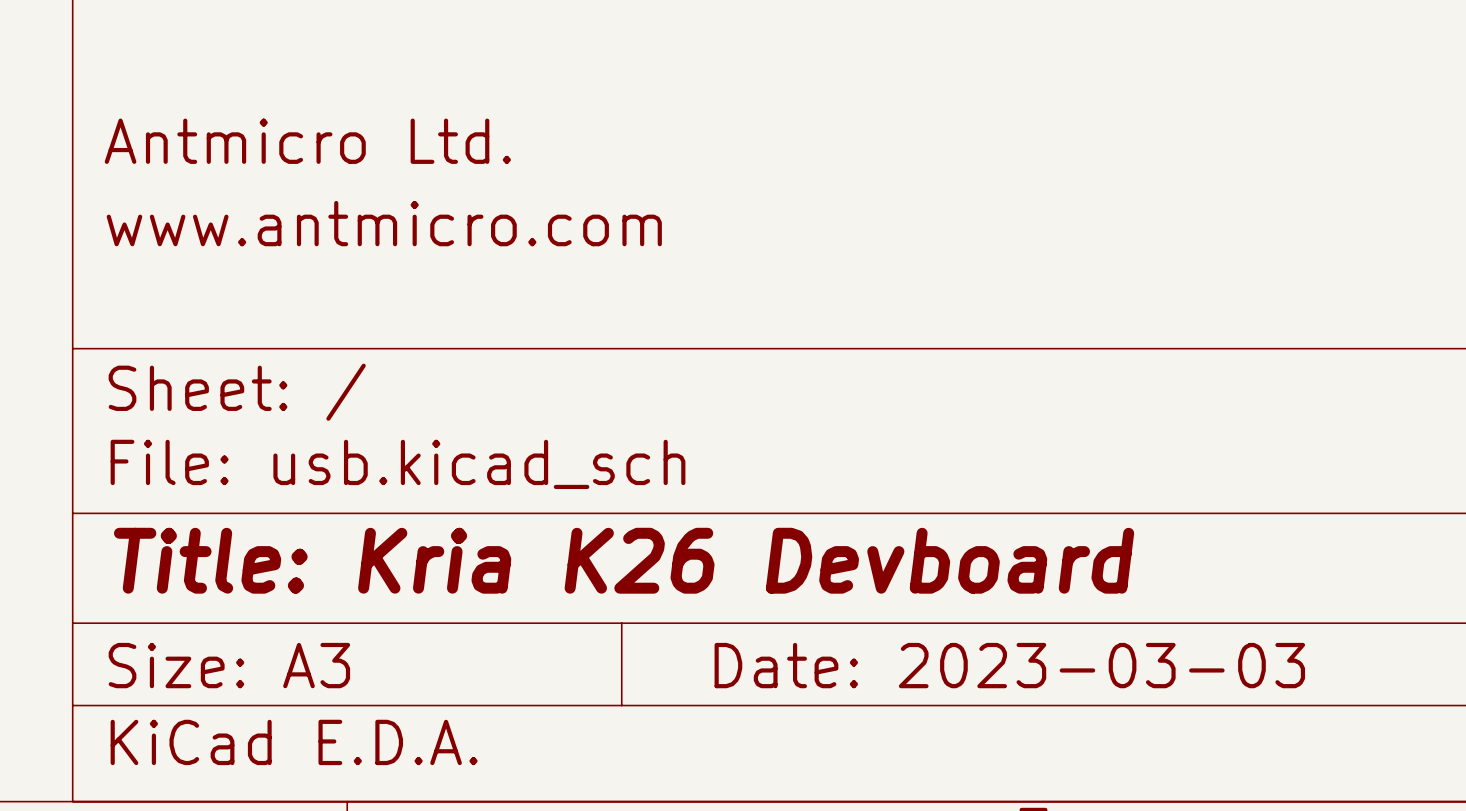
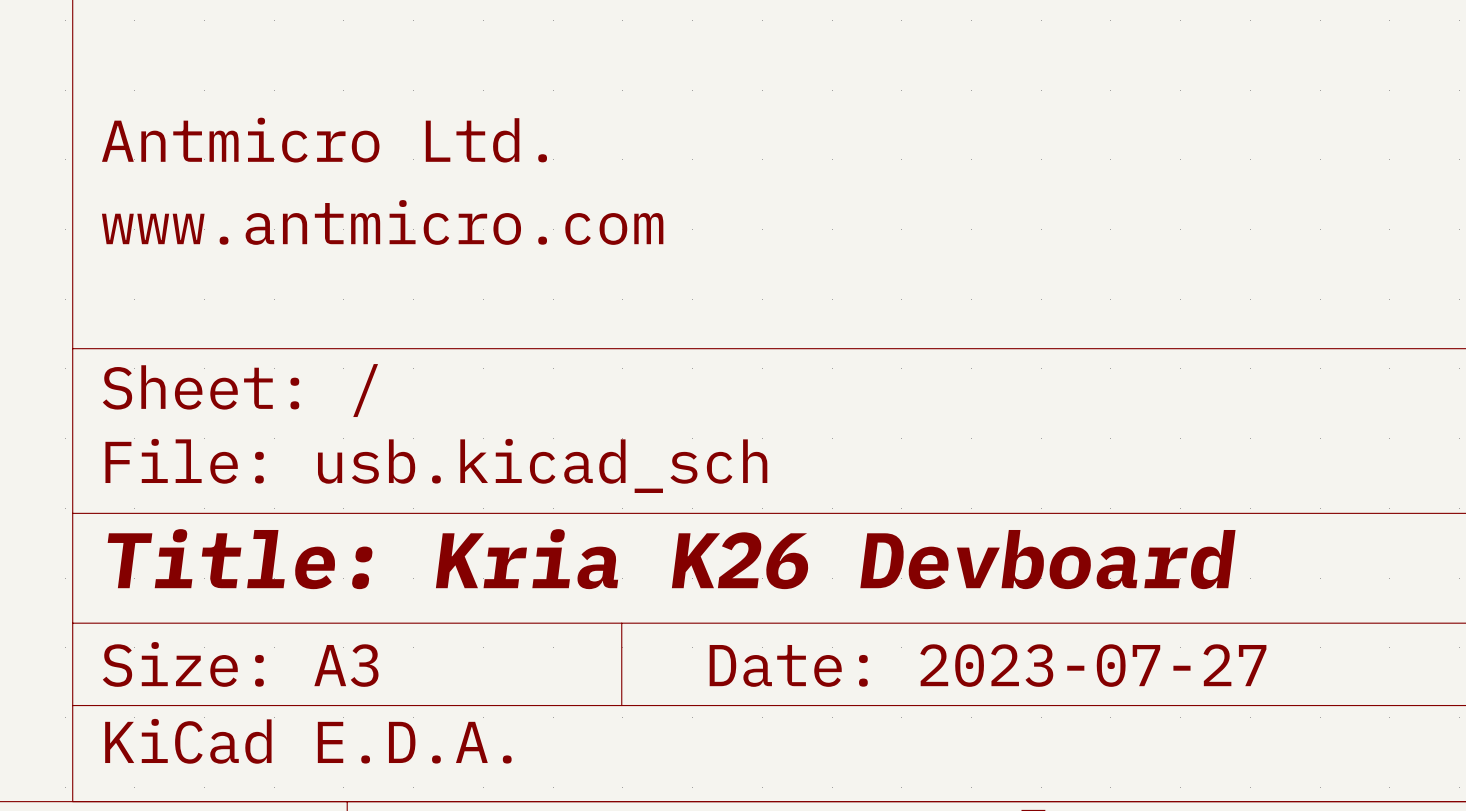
title block: Date: 2023-03-03 (1009, 665) -> Date: 2023-07-27 (988, 665)

